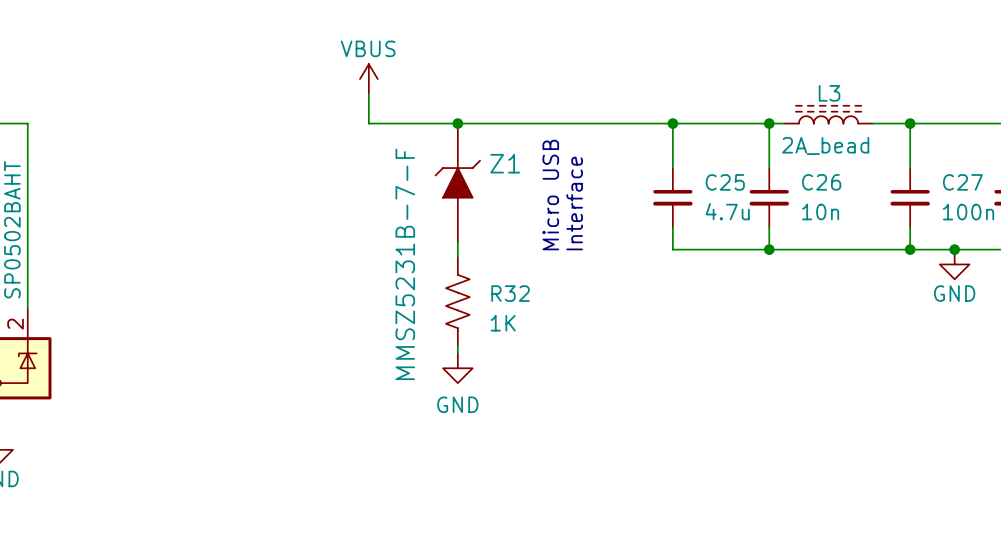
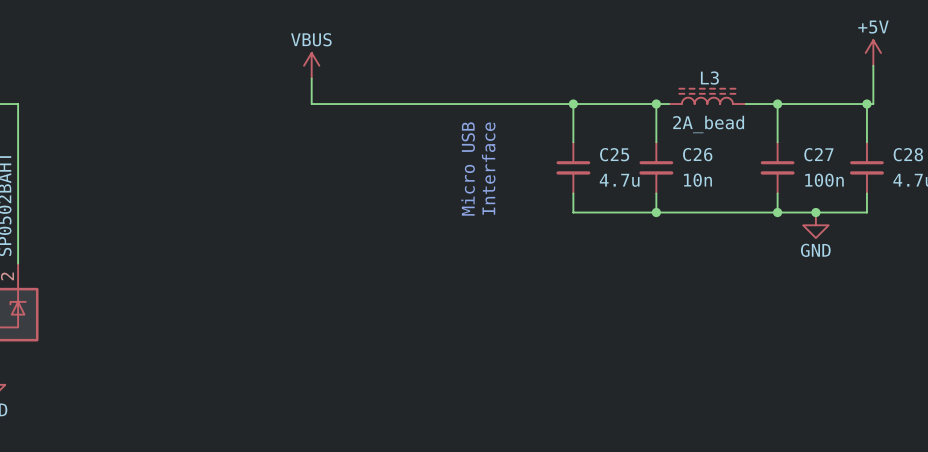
junction: (457, 123) -> none
Z1: MMSZ5231B-7-F (457, 182) -> none
wire: (457, 242) (457, 257) -> none
R32: 1K (457, 301) -> none
wire: (457, 346) (457, 353) -> none
power symbol: GND (457, 368) -> none

